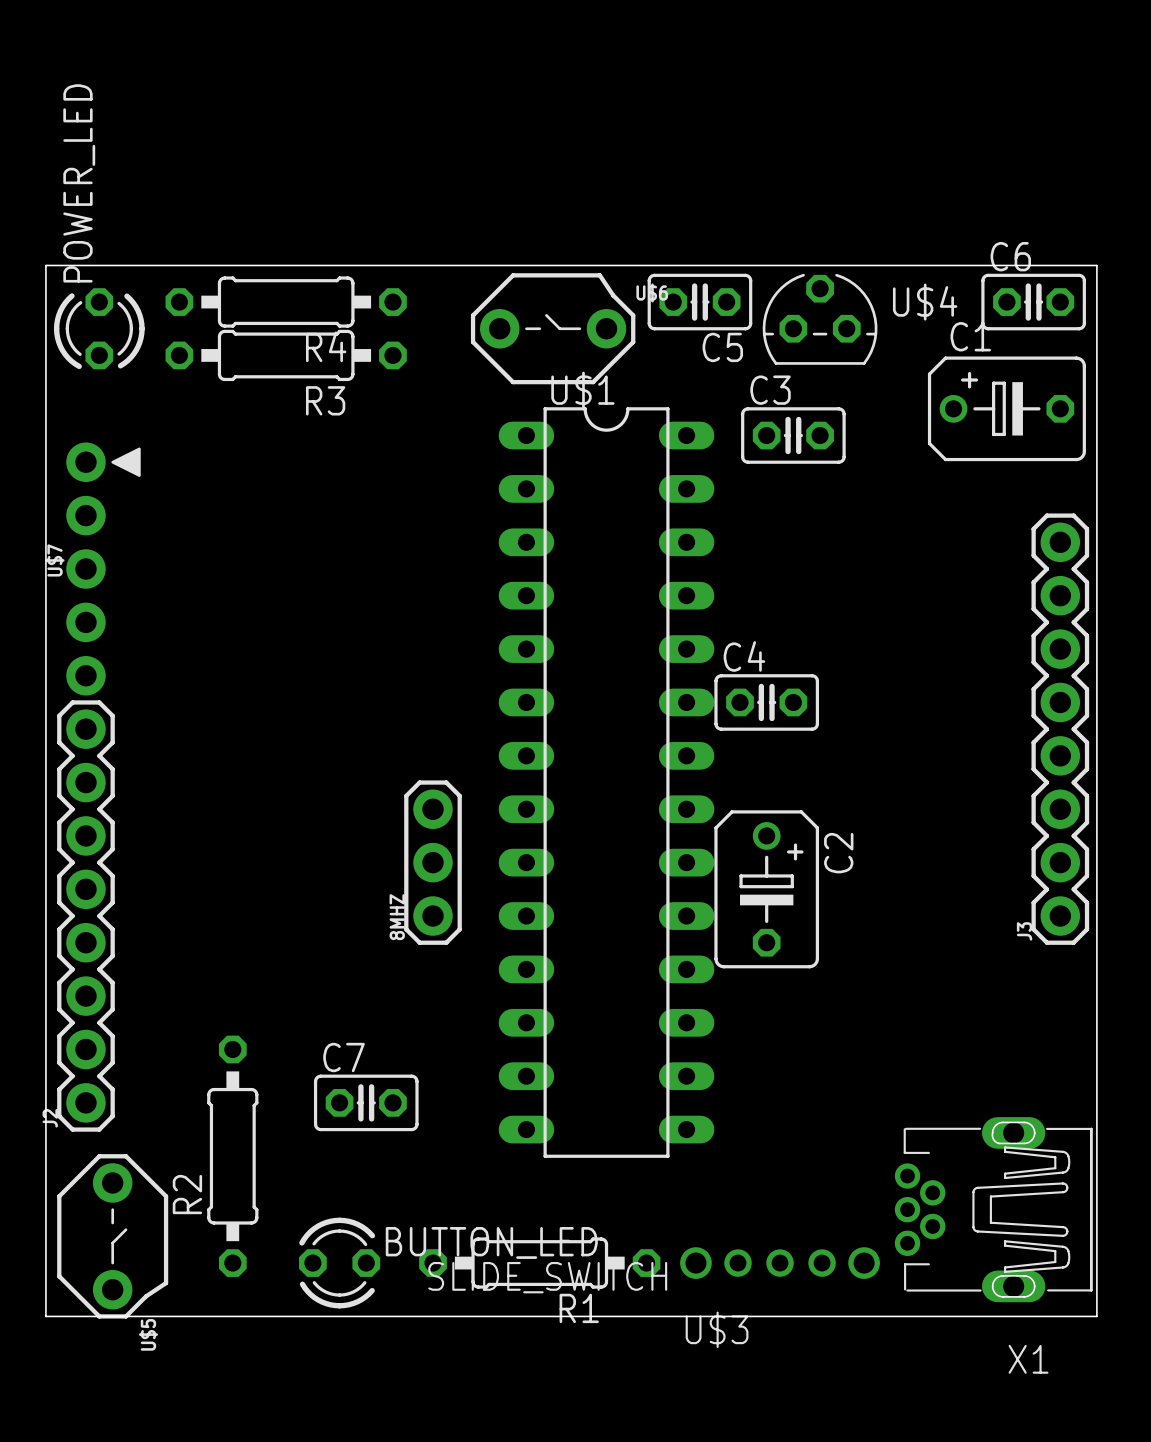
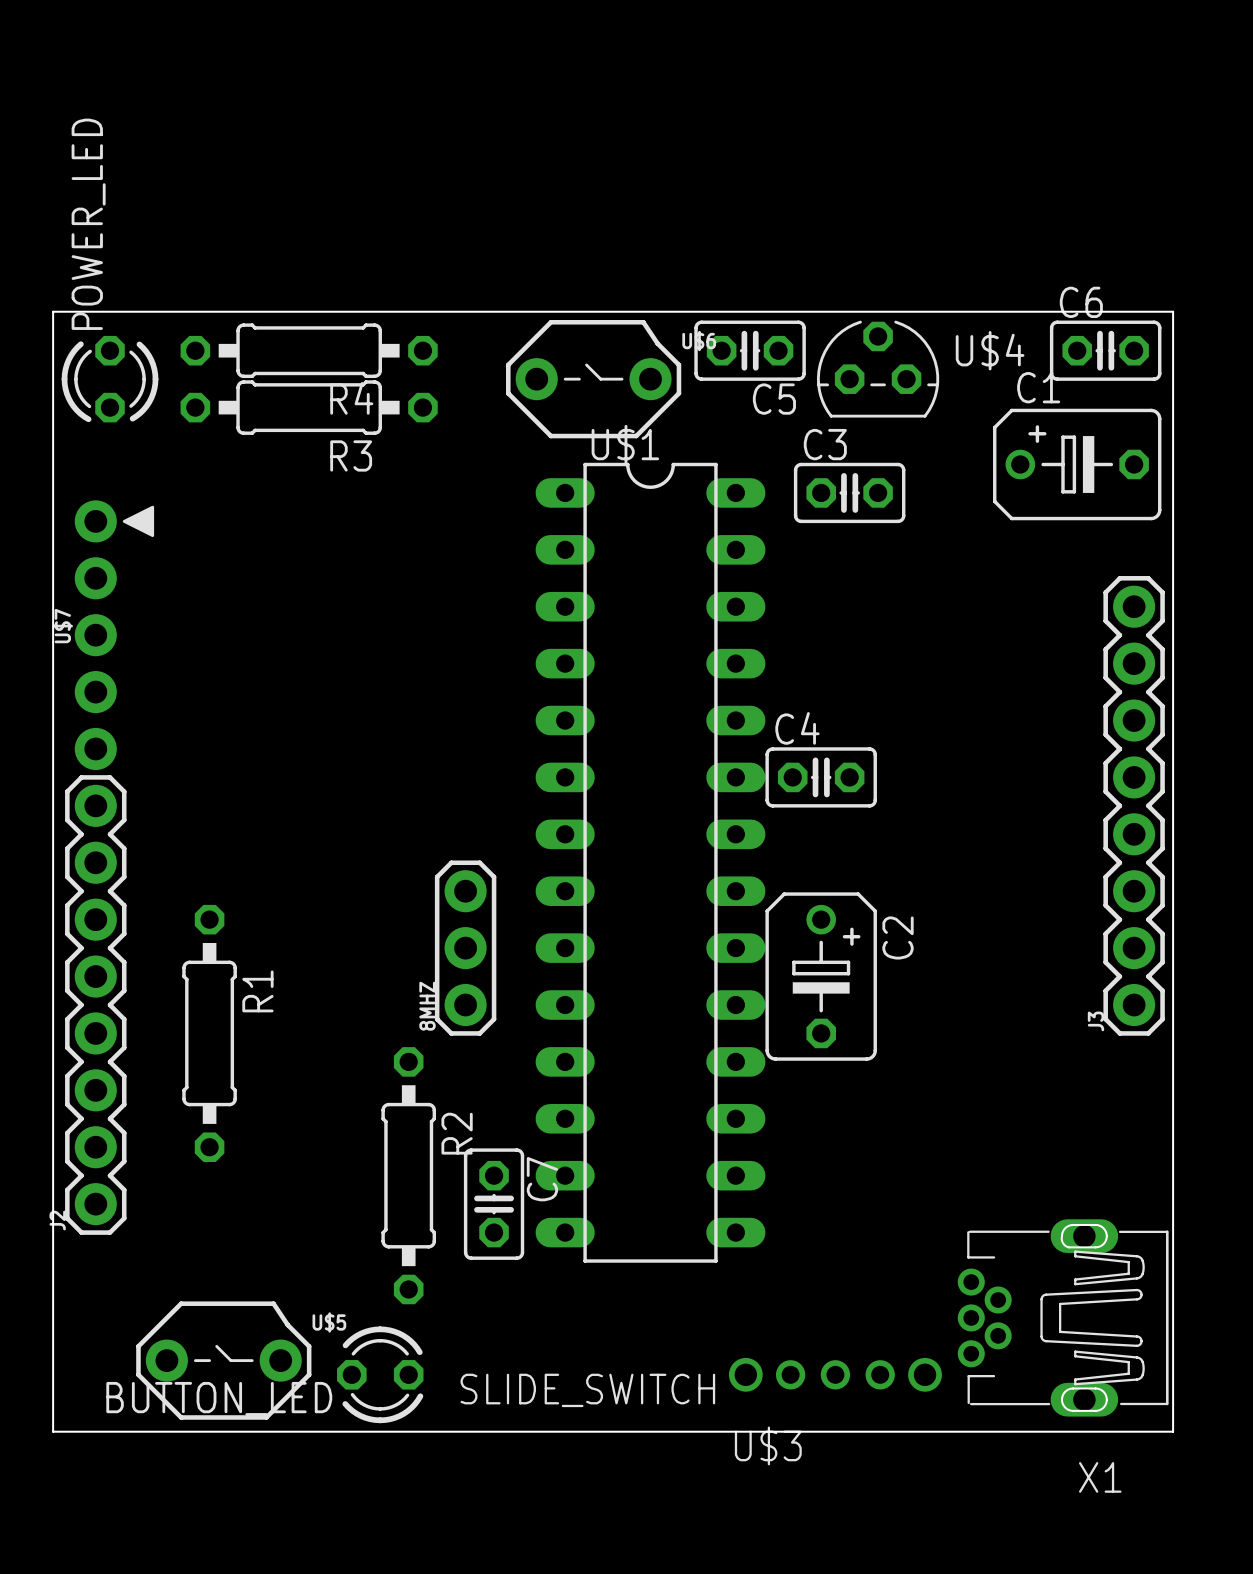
C7 rotation: 0° (366, 1102) -> 90° clockwise (494, 1204)
C7 position: (366, 1102) -> (494, 1204)
R2 position: (232, 1156) -> (408, 1175)
R2 name position: R2 (187, 1194) -> R2 (457, 1133)
U$5 rotation: 0° (112, 1236) -> 90° counterclockwise (223, 1360)
BUTTON_LED rotation: 0° (339, 1263) -> 180° (380, 1374)
R1 rotation: 0° (539, 1263) -> 90° clockwise (209, 1033)
R1 position: (539, 1263) -> (209, 1033)
R1 name position: R1 (579, 1308) -> R1 (257, 991)

